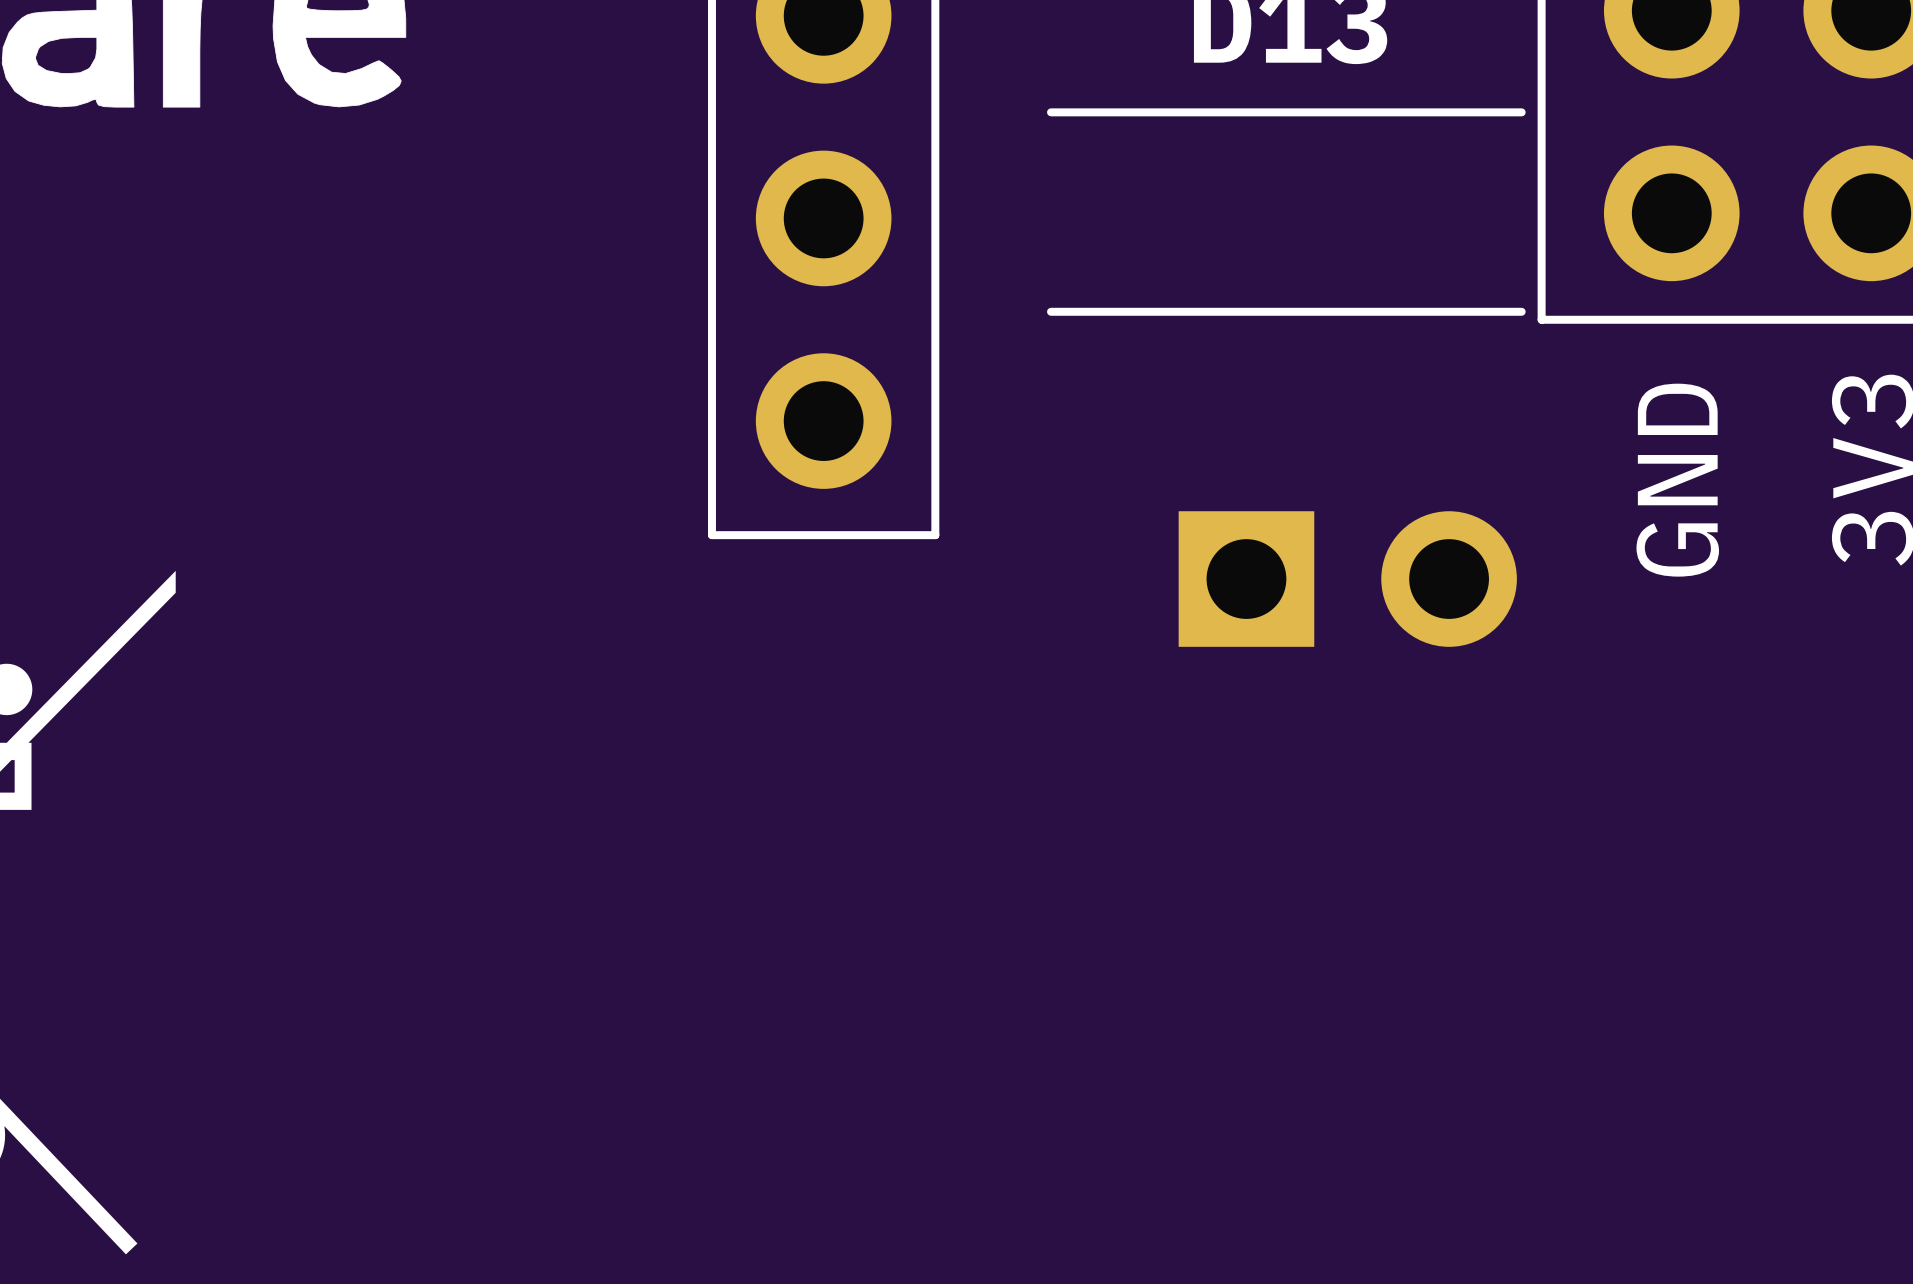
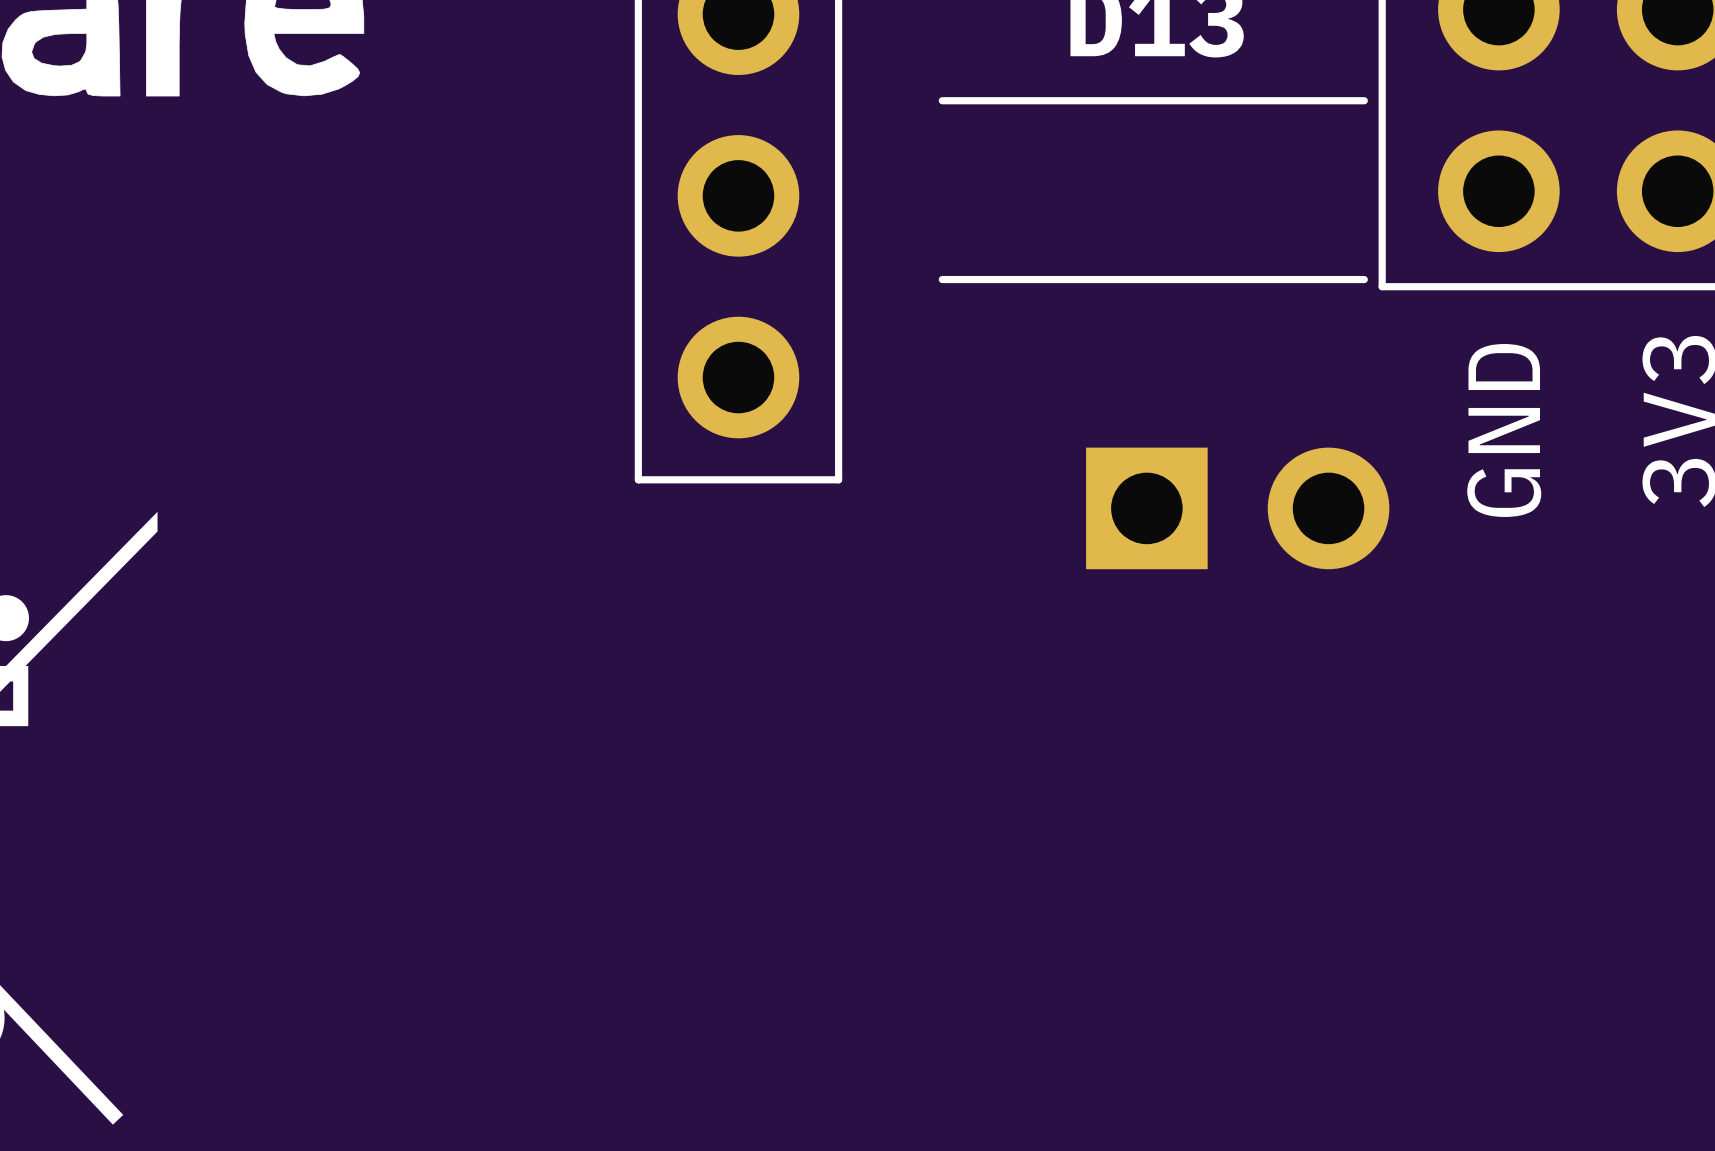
part position: (1347, 579) -> (1237, 508)

